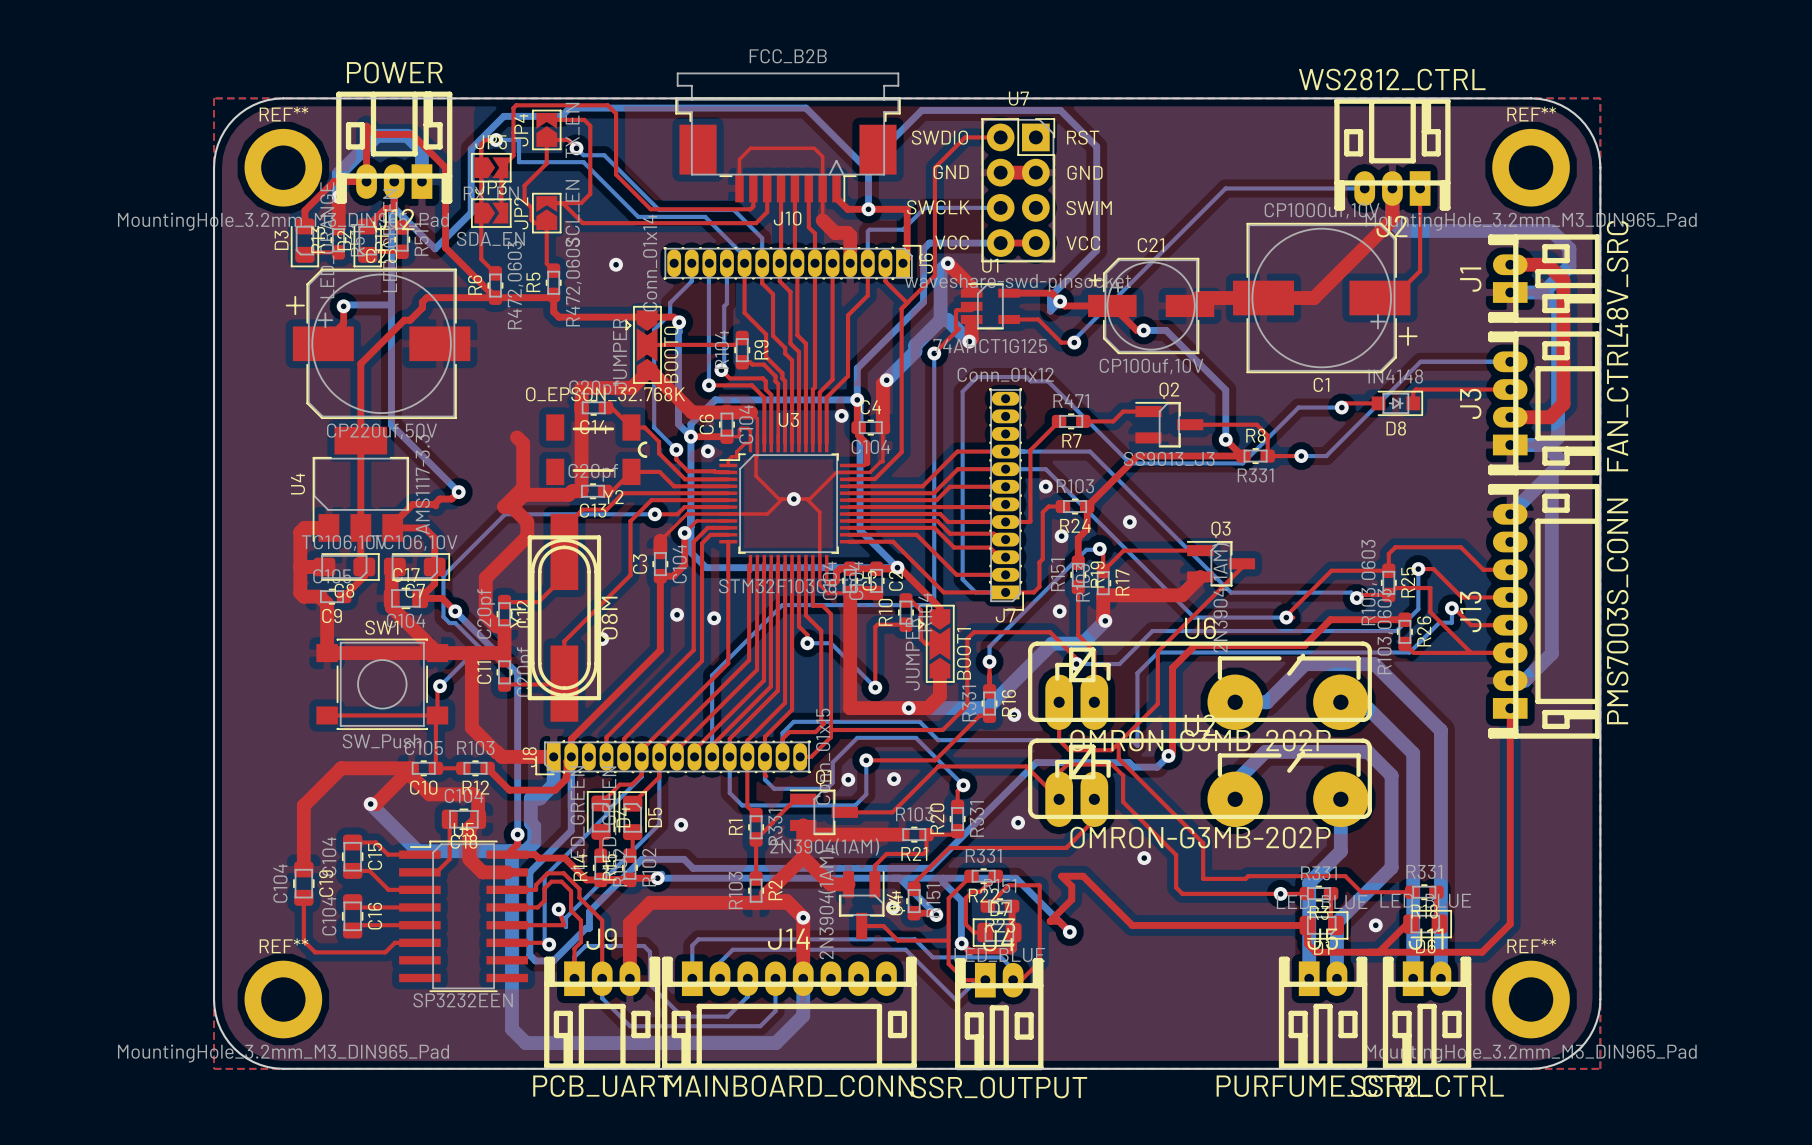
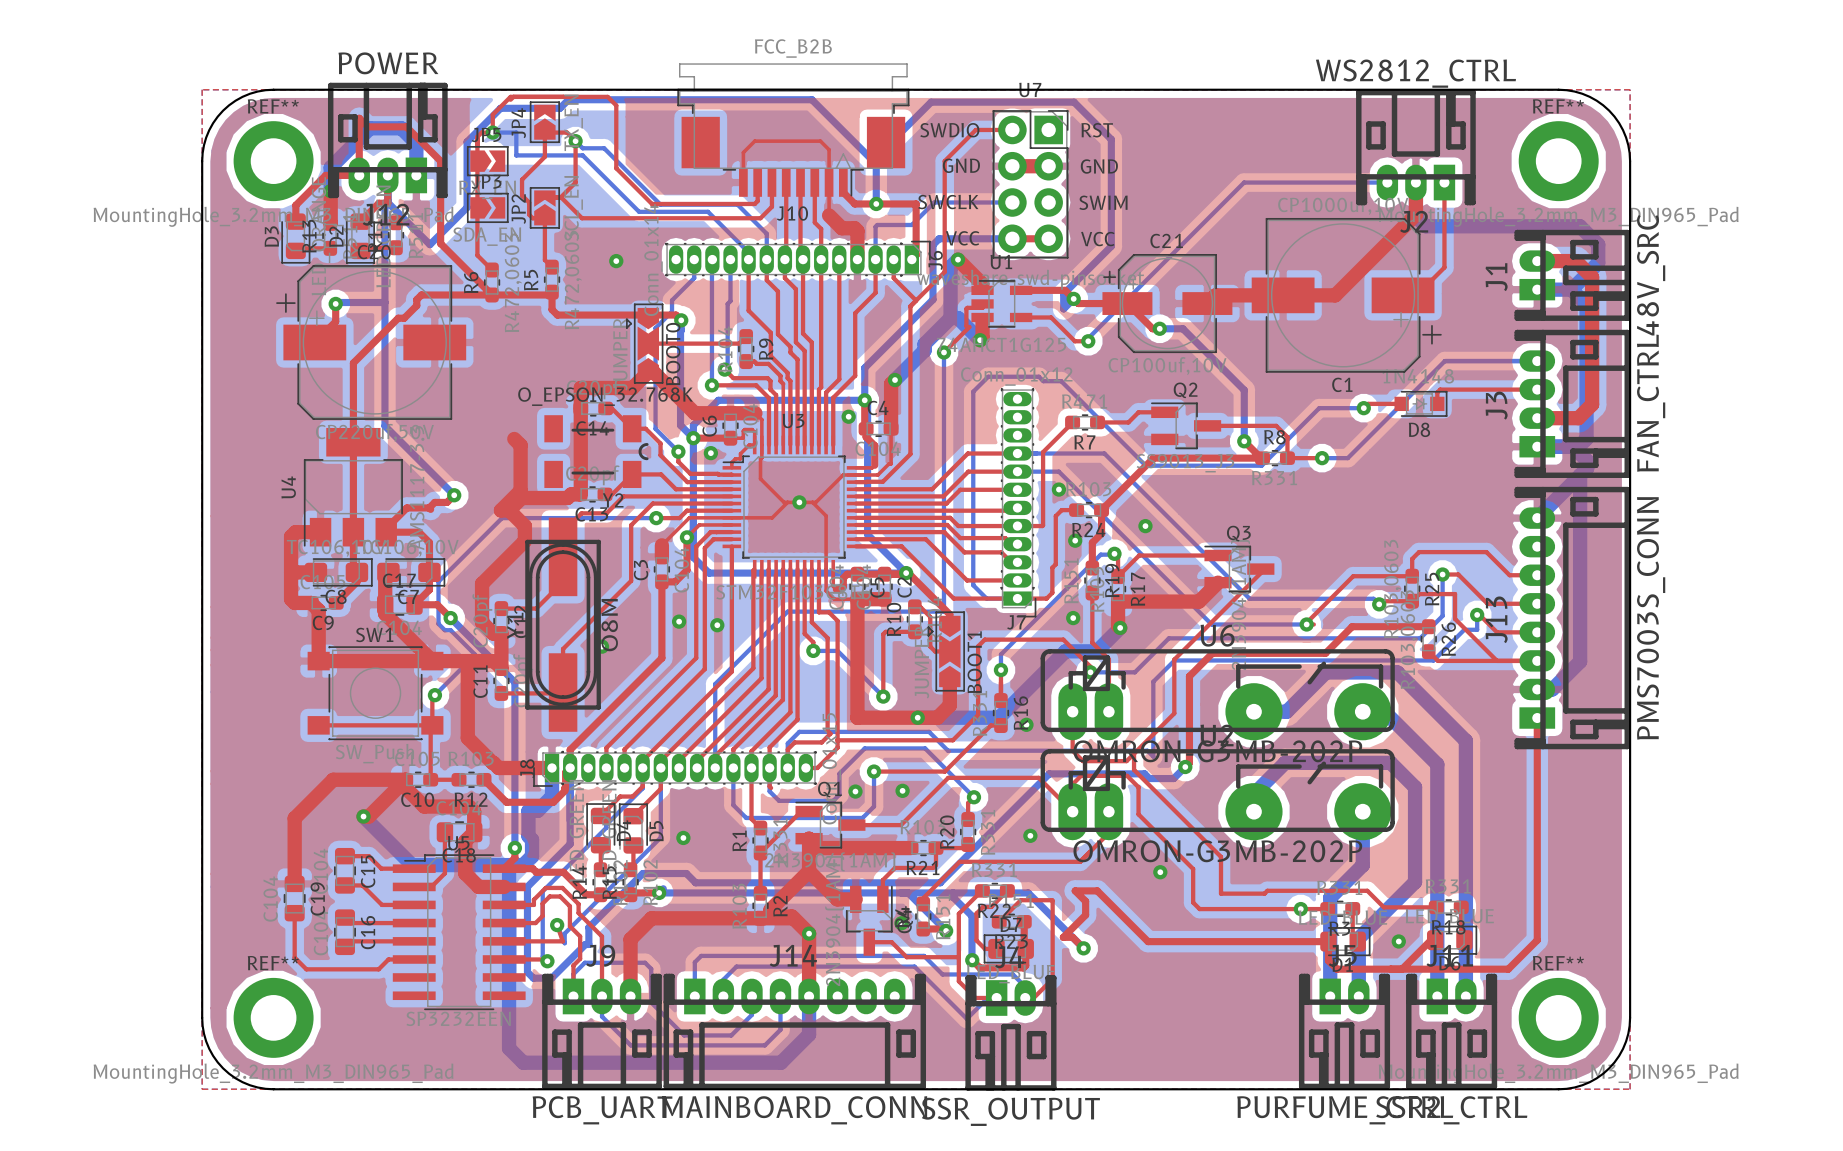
top track: none -> (513, 96) (510, 96) (492, 114) (492, 132)
top track: (513, 108) (513, 155) (501, 167) (501, 213) -> none
top track: (546, 119) (584, 119) (590, 125) (590, 193) (581, 203) (562, 203) -> none
top track: none -> (575, 141) (575, 182) (560, 197)

